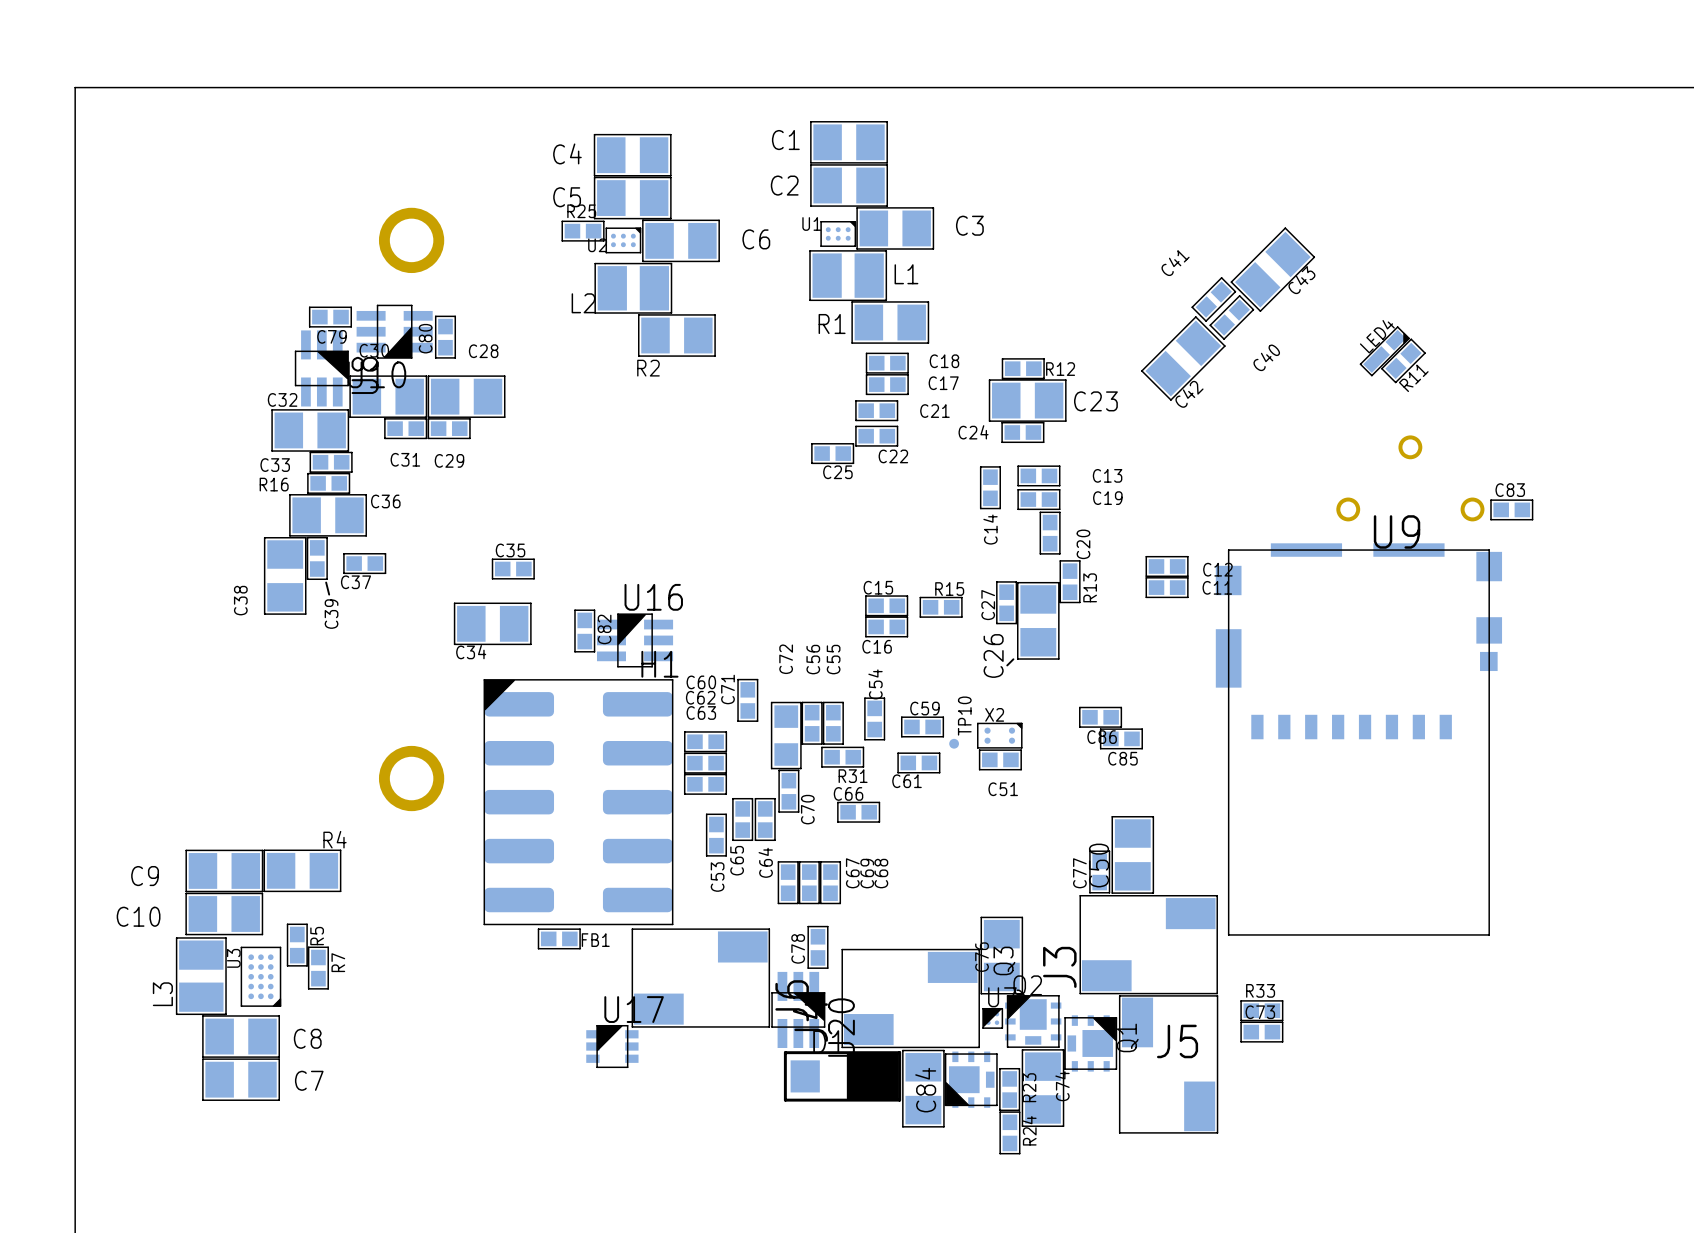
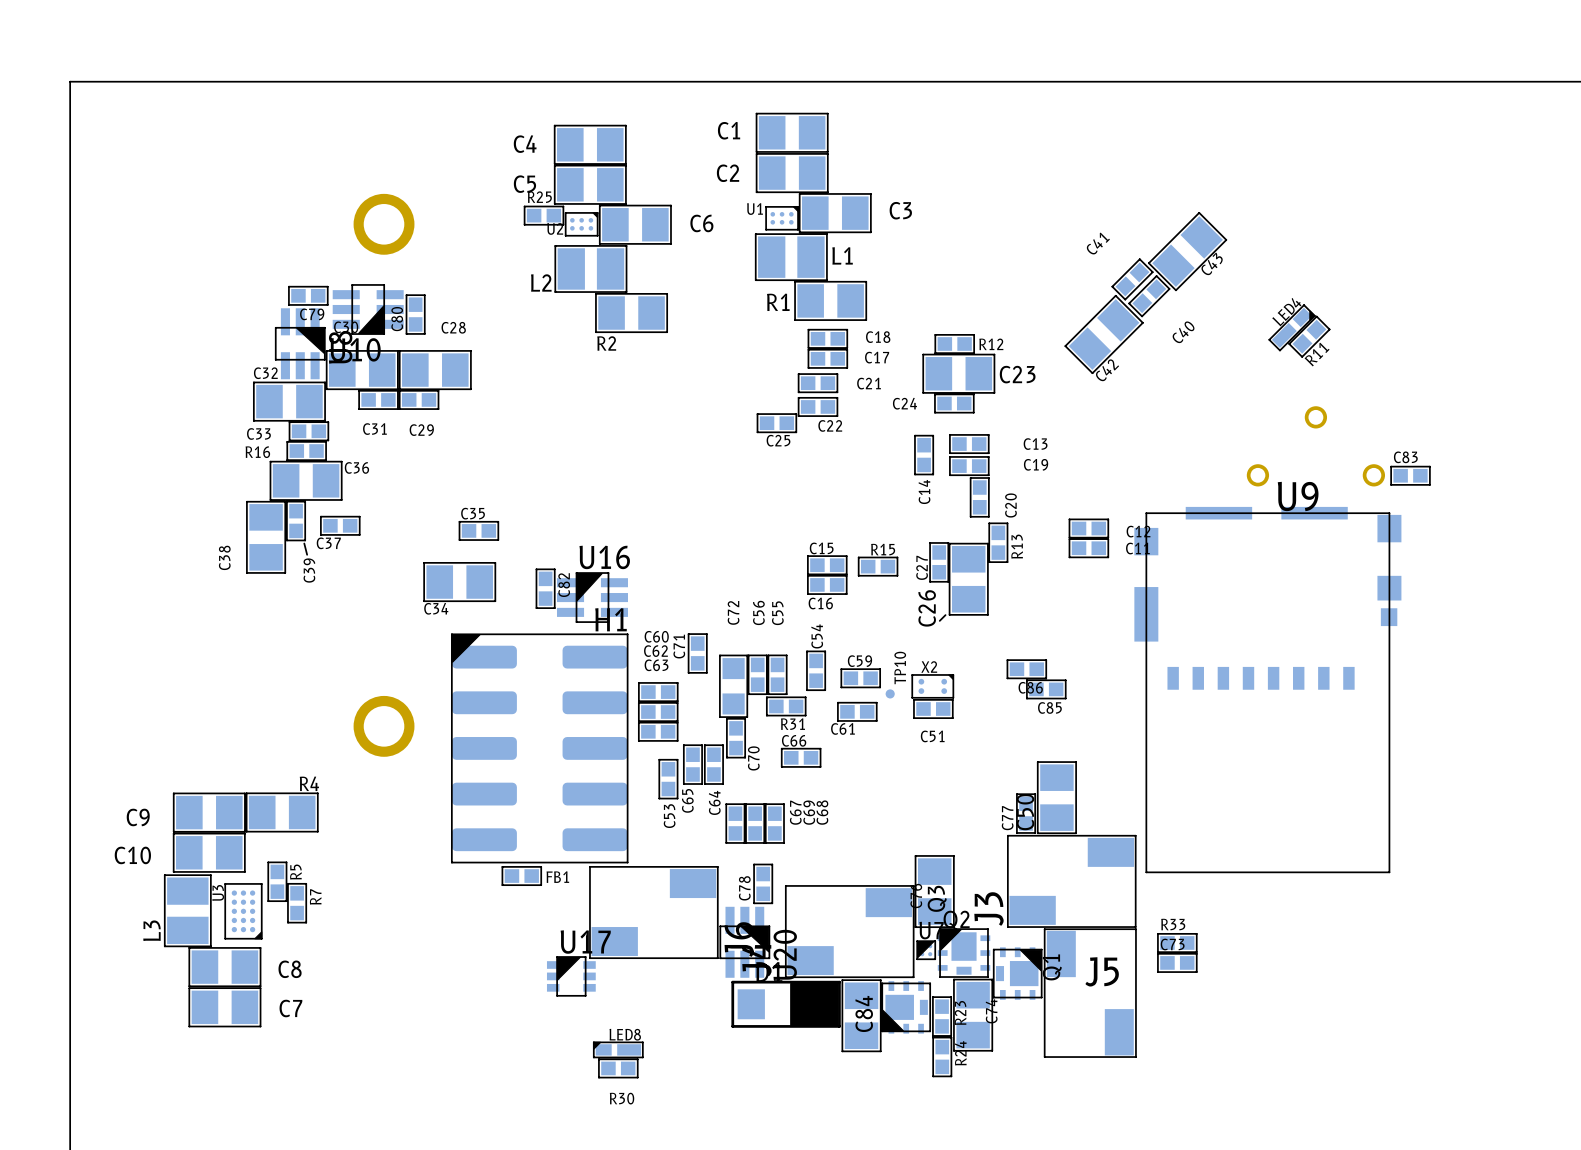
LED8: none -> (618, 1049)
R30: none -> (618, 1068)

